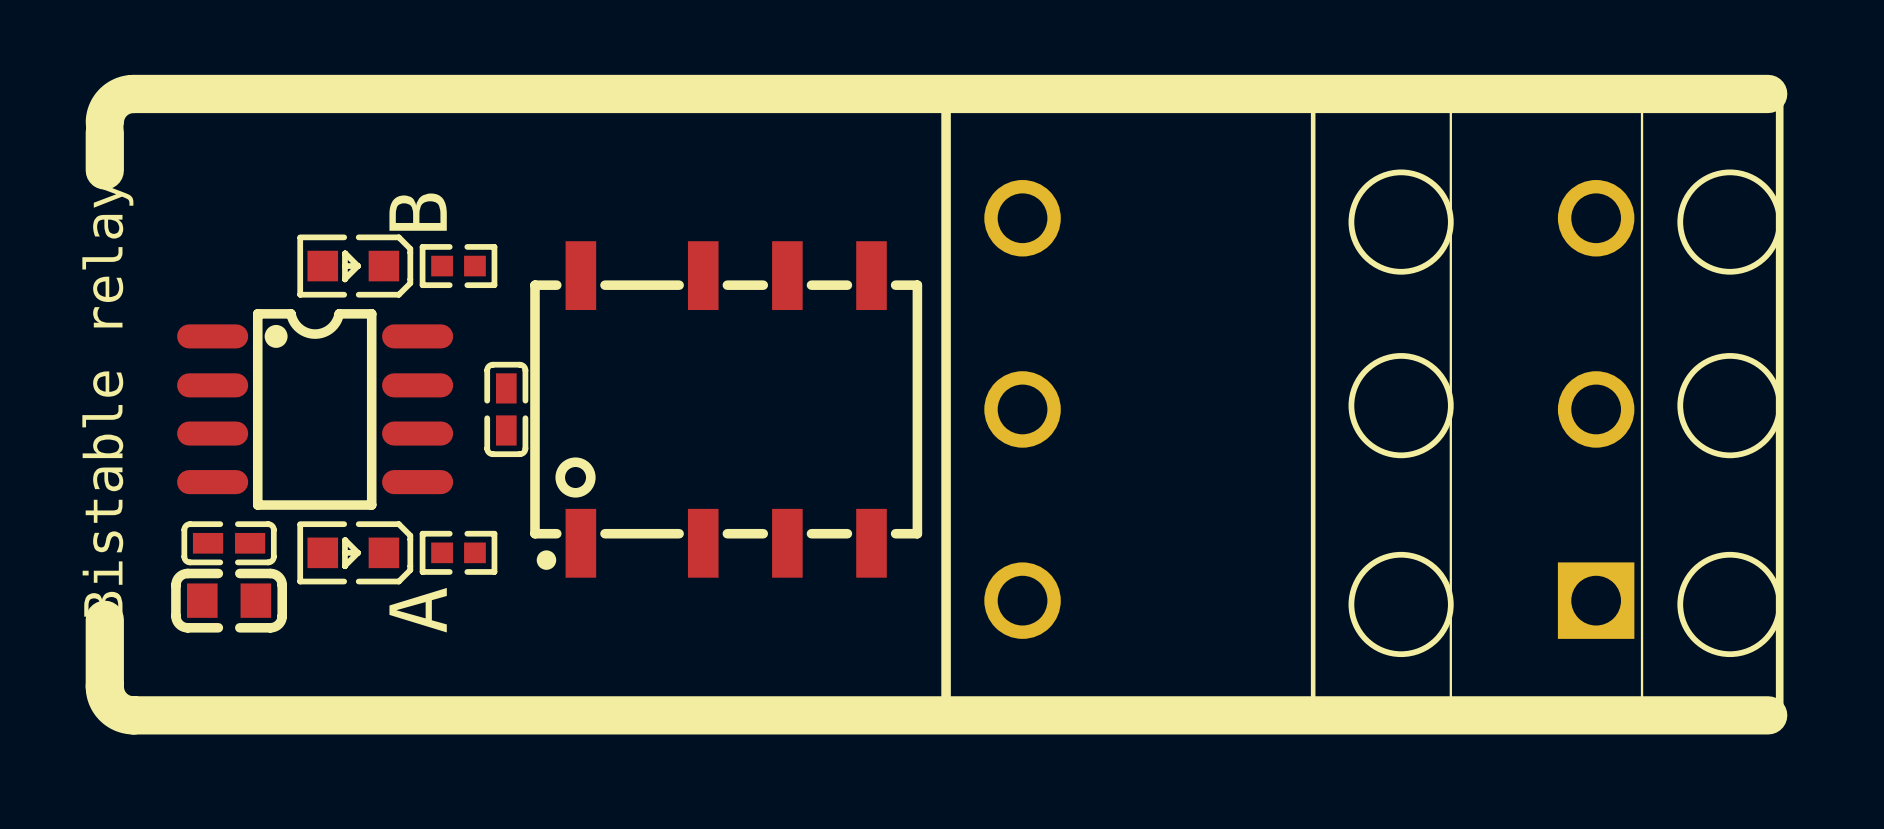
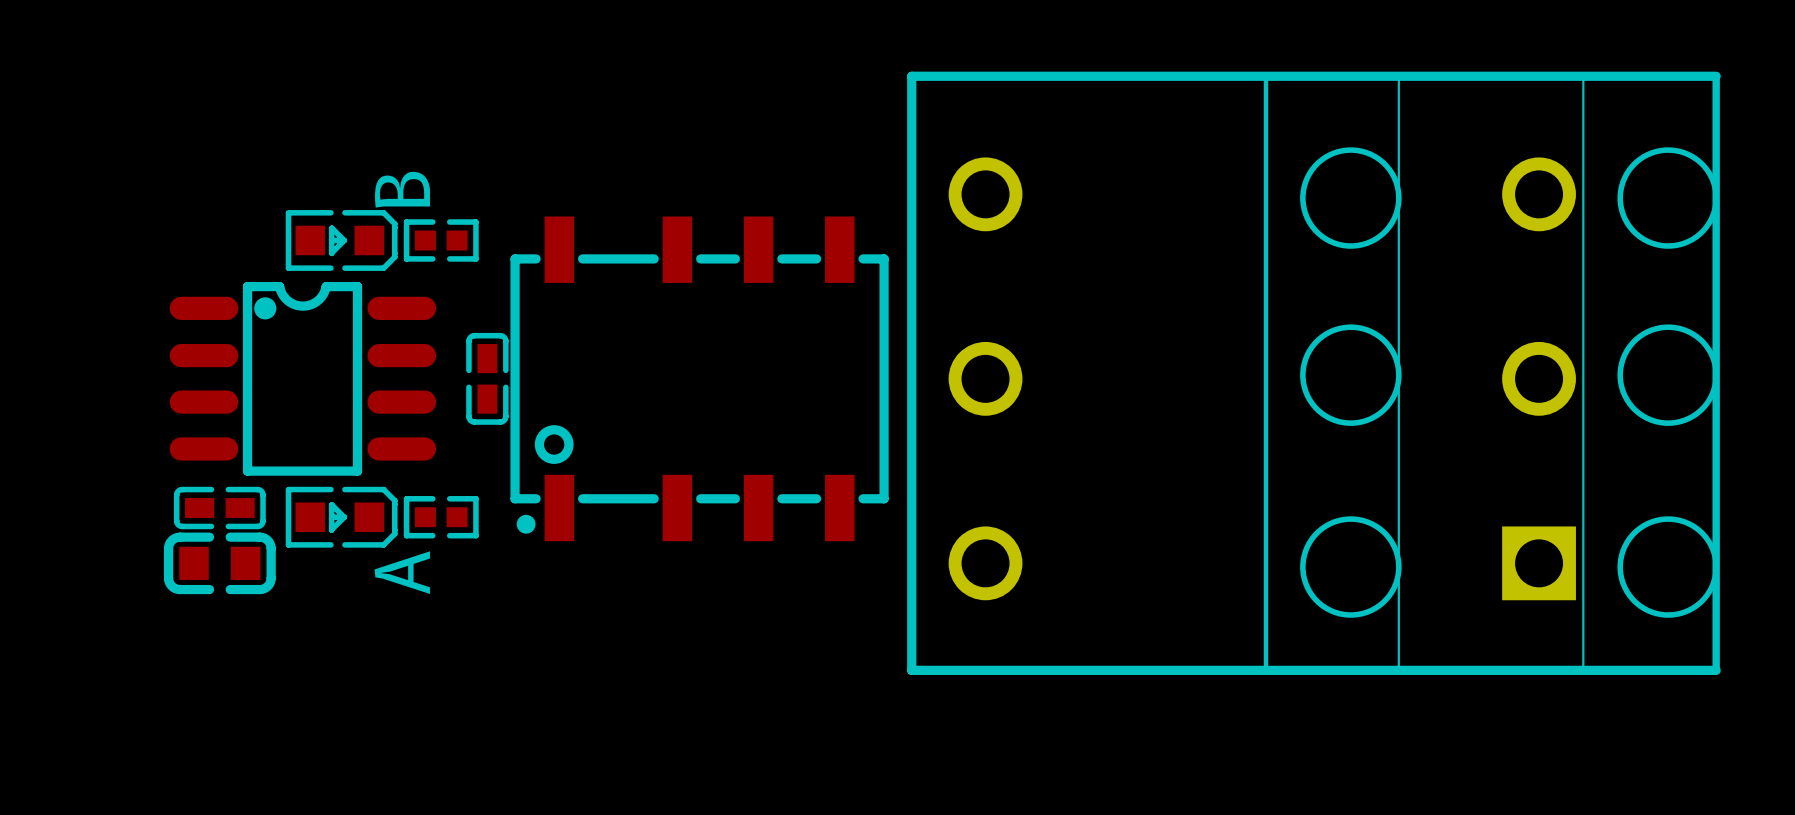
line: (1768, 93) (133, 93) (122, 96) (113, 102) (106, 111) (104, 122) -> none
line: (104, 132) (104, 170) -> none
text: Bistable relay (107, 398) -> none
line: (104, 619) (105, 694) (116, 709) (133, 715) (1768, 715) -> none

